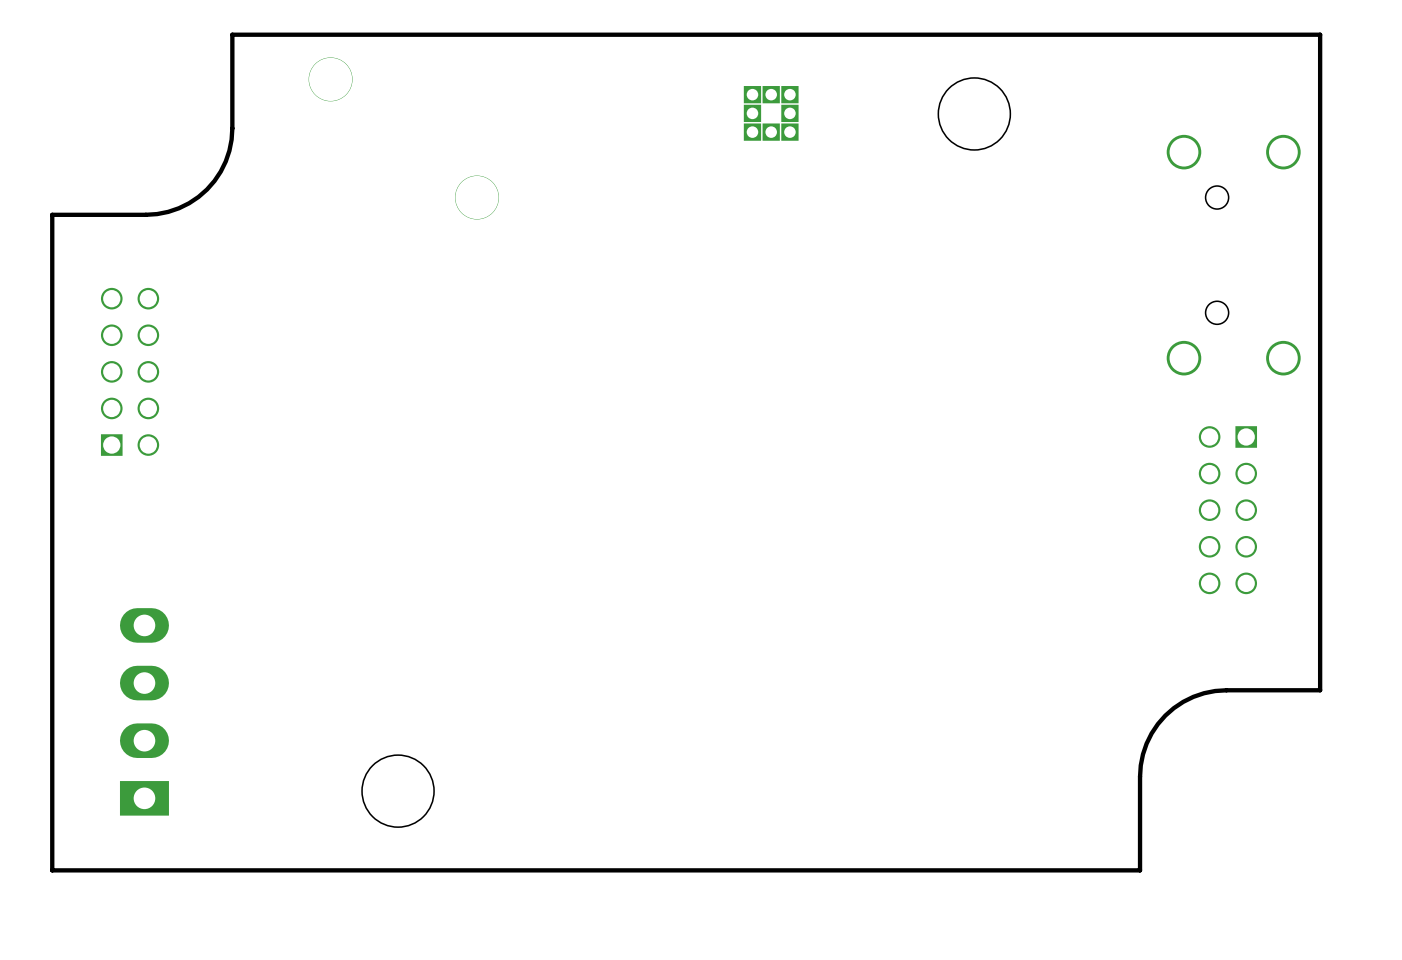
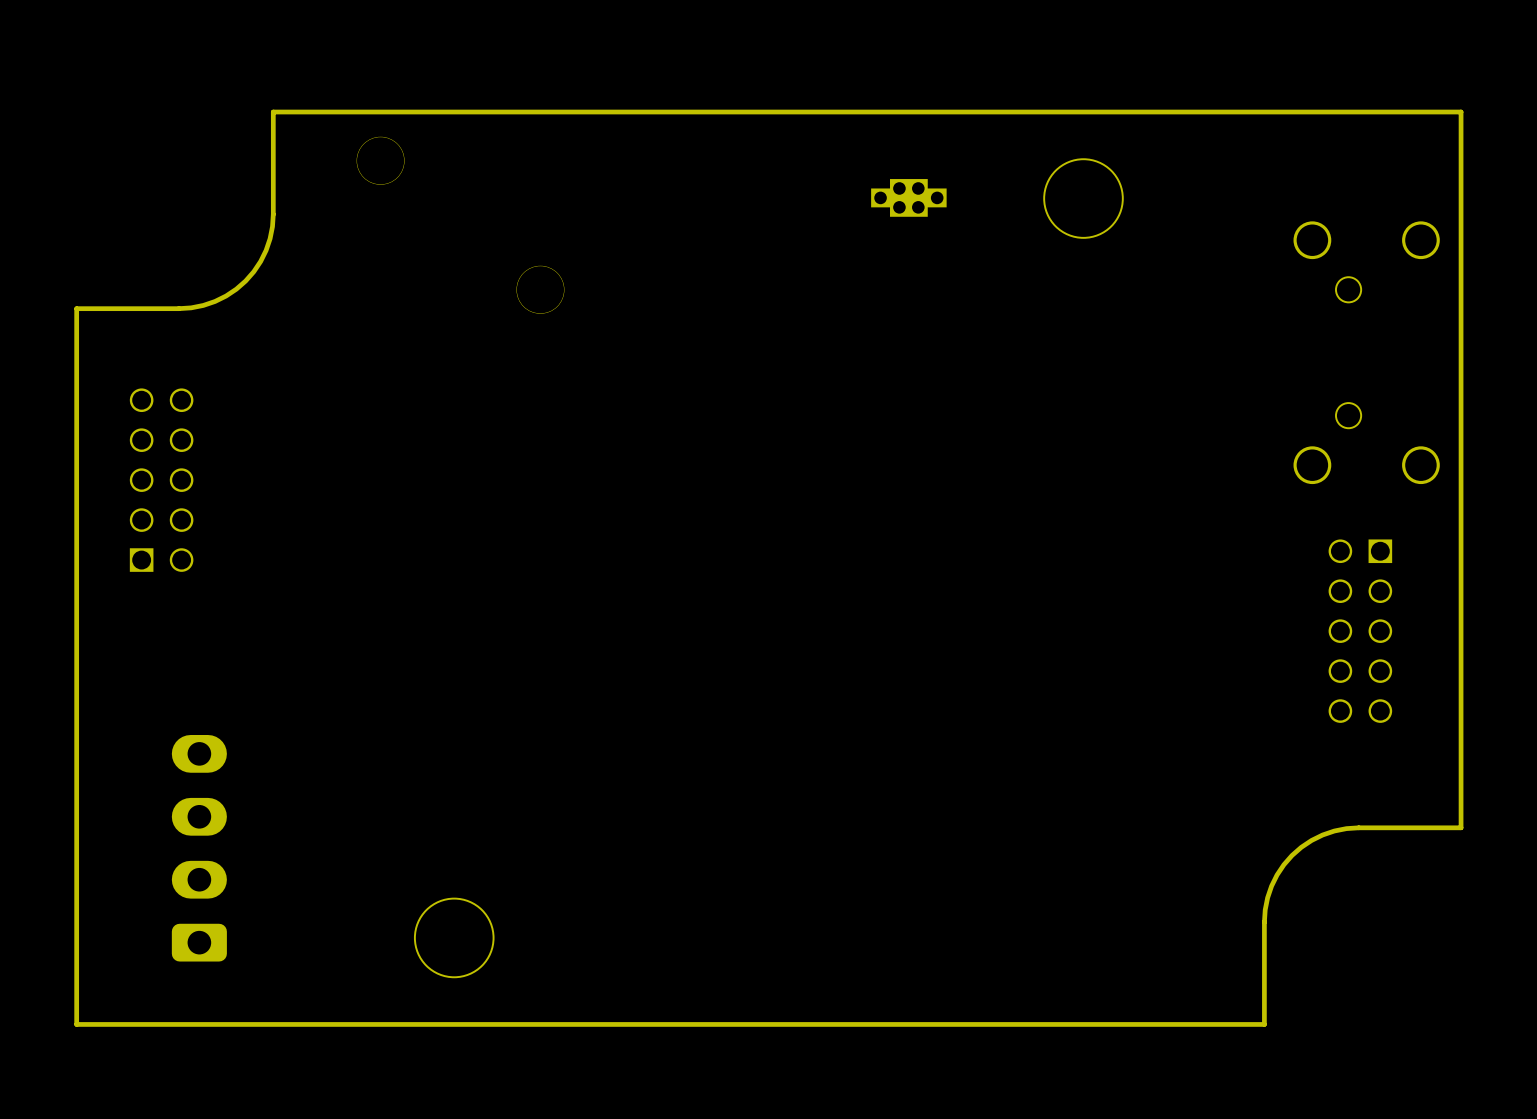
part: (771, 113) -> none
part: none -> (908, 197)
part footprint: [119, 608, 169, 816] -> [171, 734, 227, 962]

